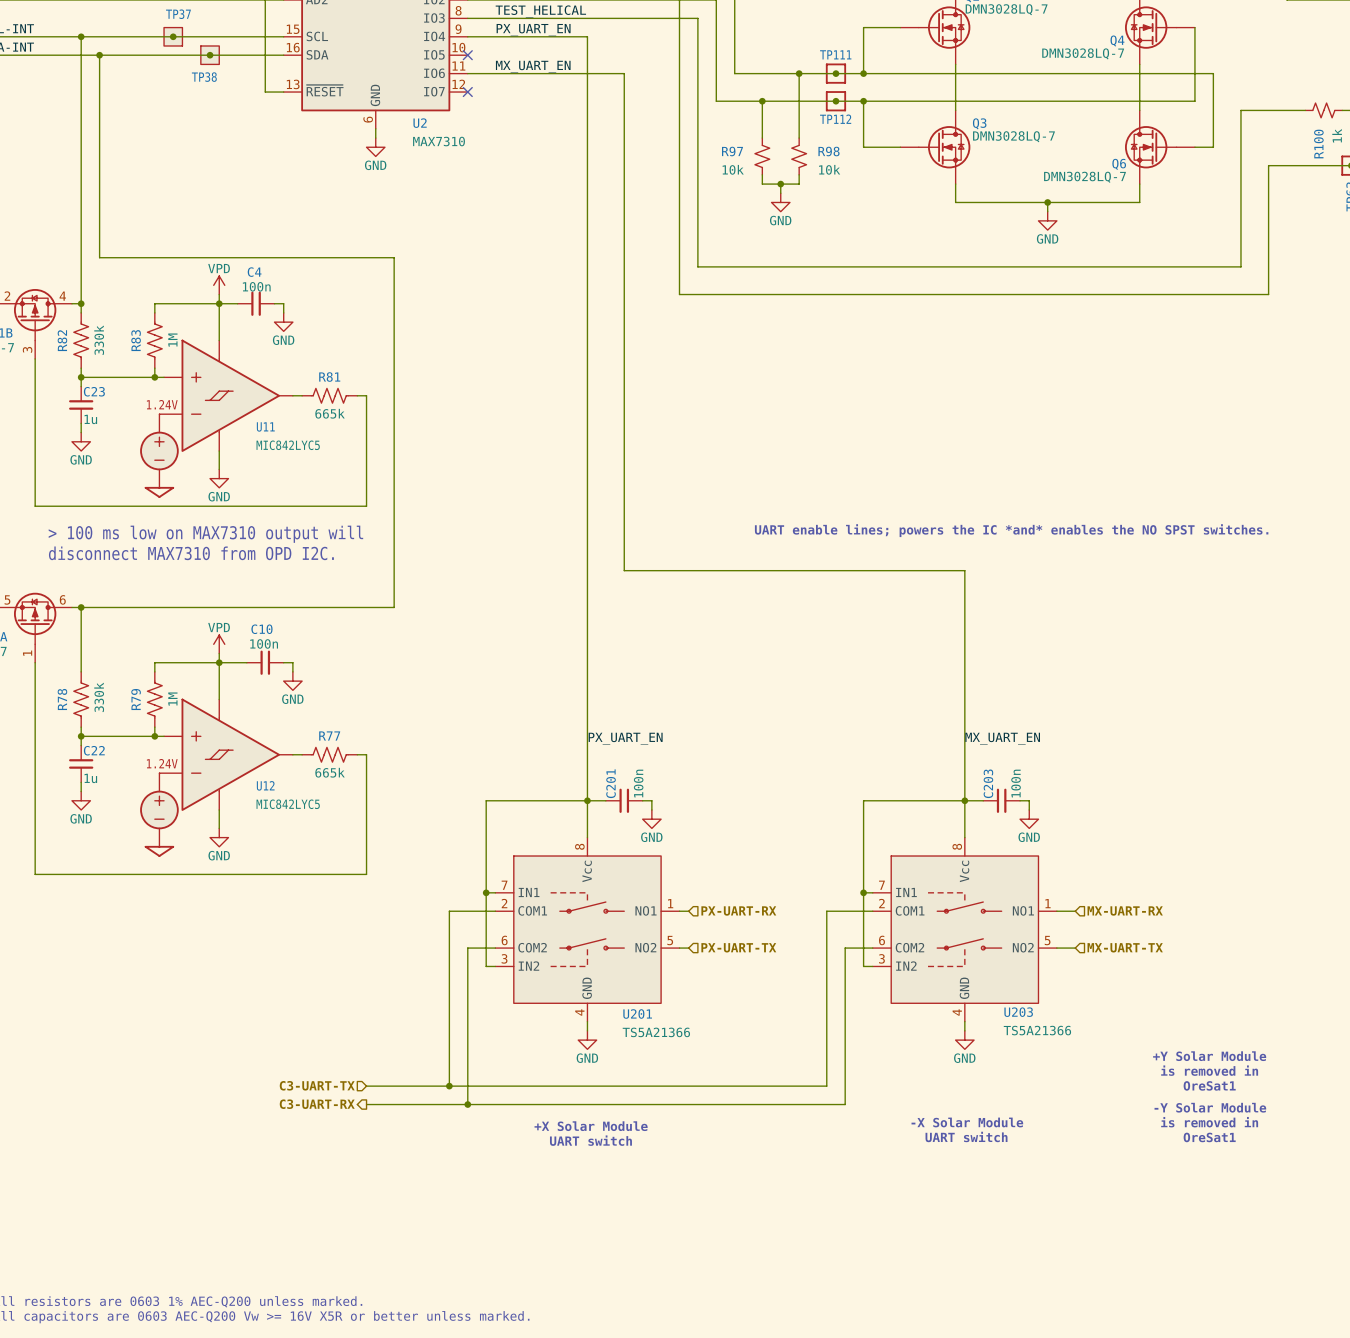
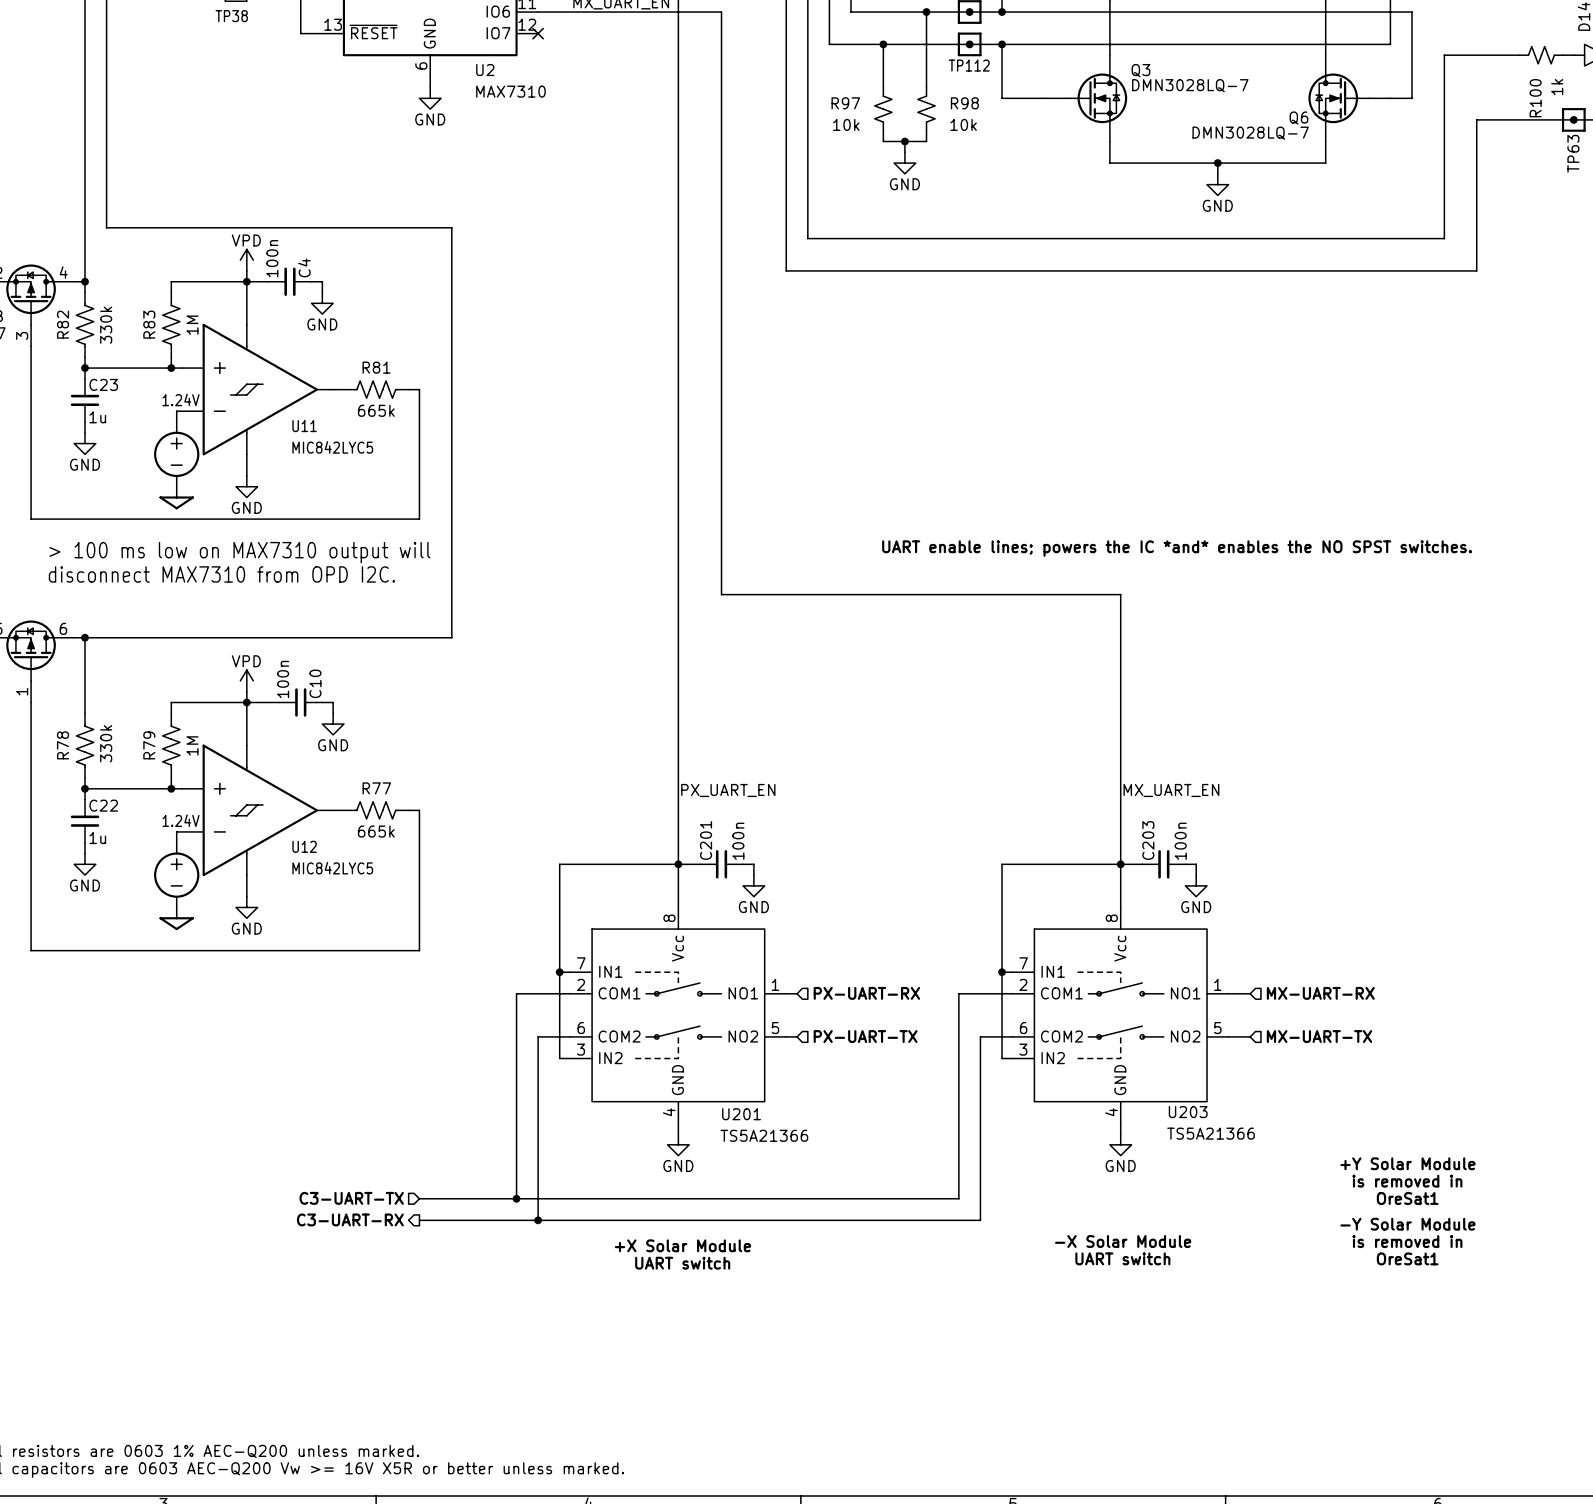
C4 name rotation: 0° (254, 272) -> 90° counterclockwise (304, 267)
C4 value rotation: 0° (256, 286) -> 90° counterclockwise (272, 258)
C10 name rotation: 0° (261, 629) -> 90° counterclockwise (315, 683)
C10 value rotation: 0° (264, 643) -> 90° counterclockwise (283, 679)

